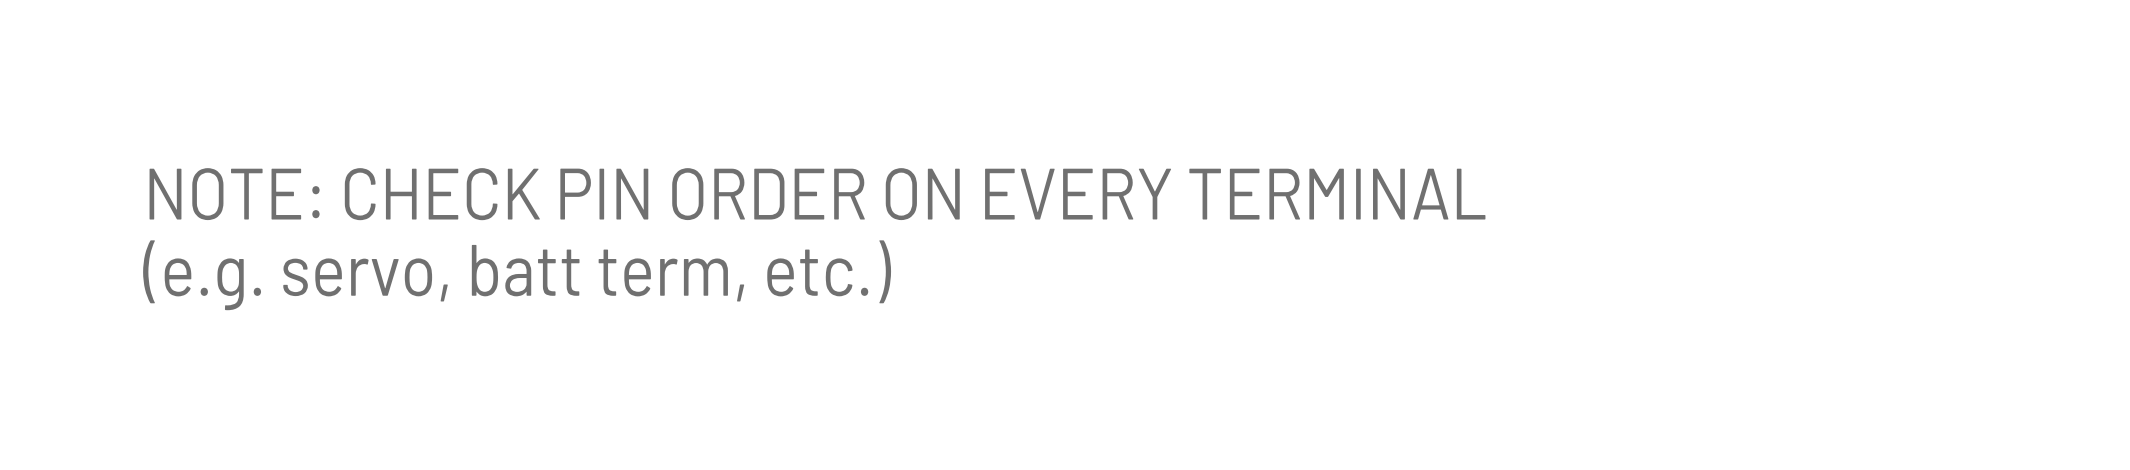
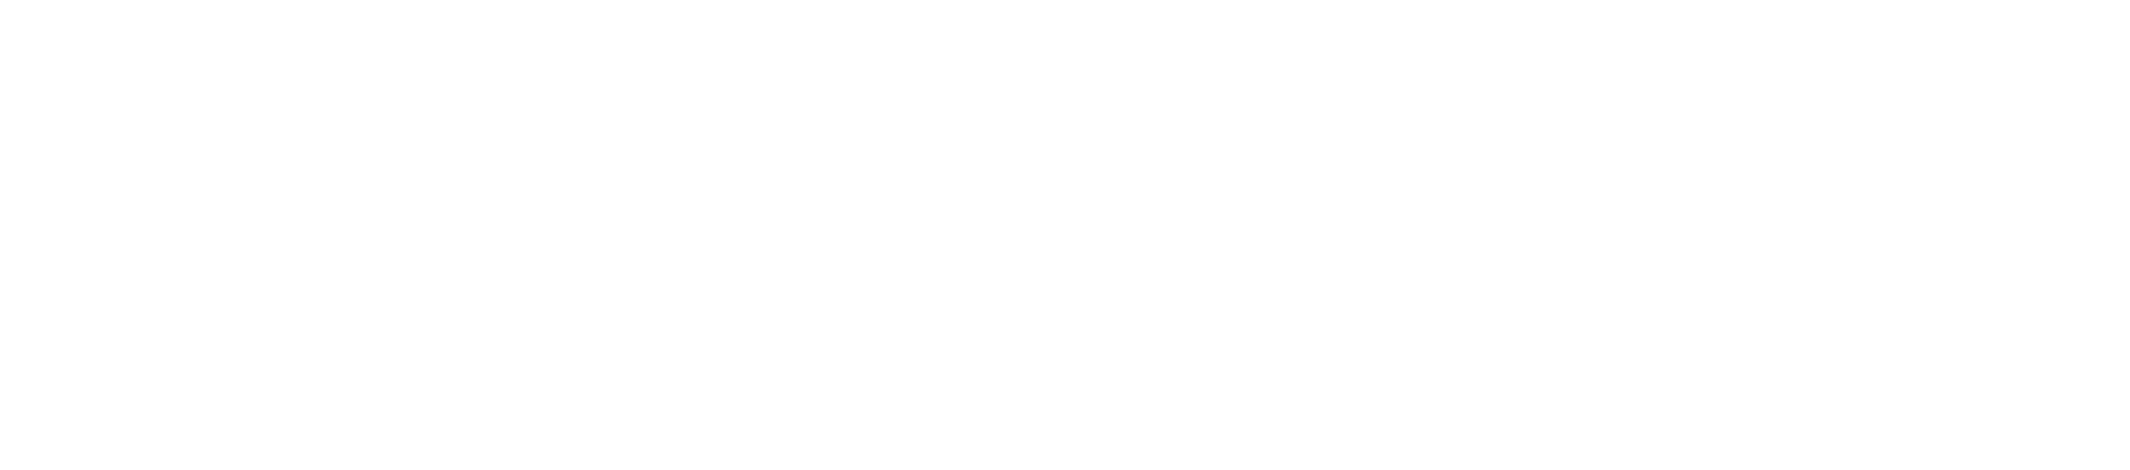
text: NOTE: CHECK PIN ORDER ON EVERY TERMINAL (817, 194) -> none
text: (e.g. servo, batt term, etc.) (517, 275) -> none

